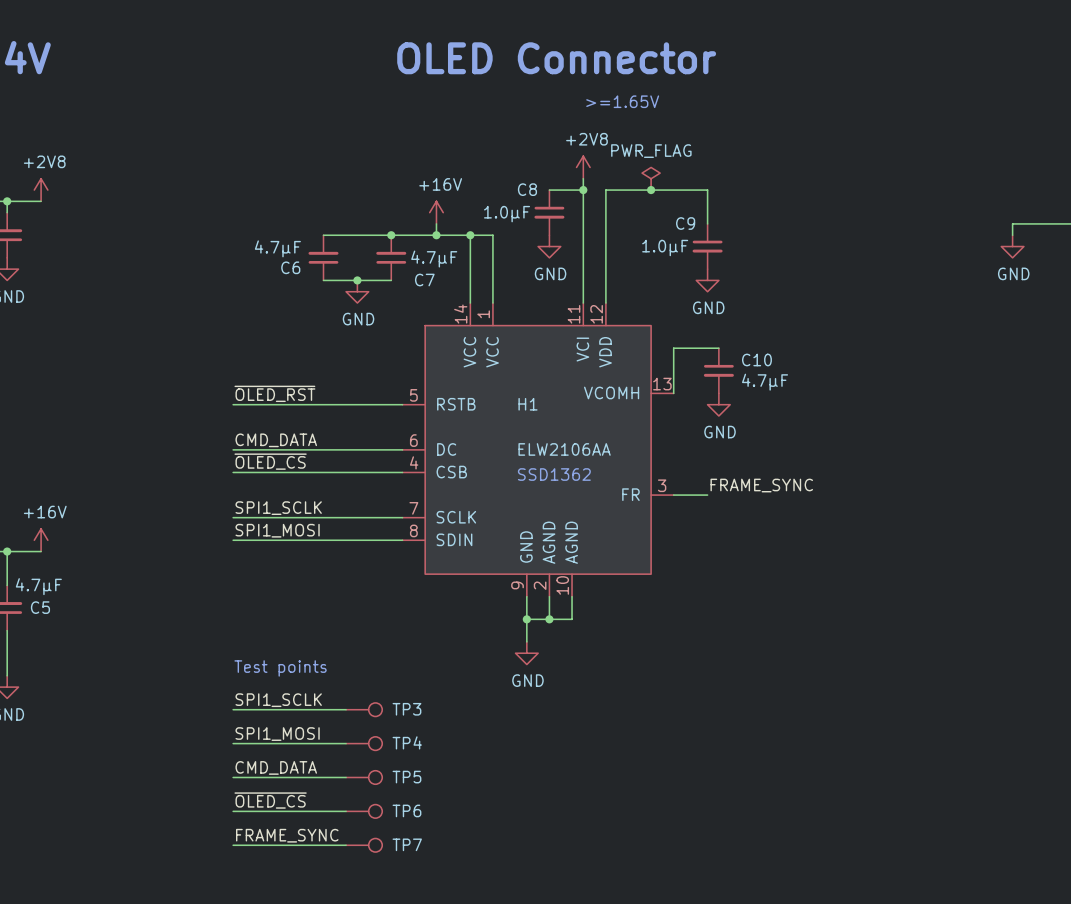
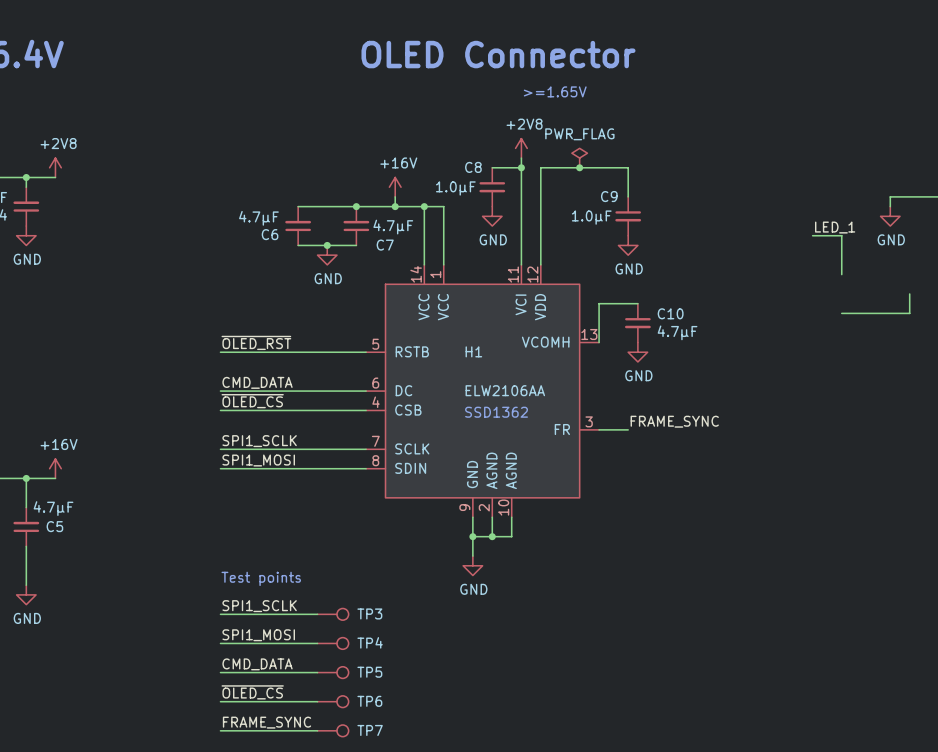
label: none -> LED_1 (835, 227)
wire: none -> (812, 235) (841, 235) (841, 274)
wire: none -> (909, 293) (909, 313) (841, 313)

